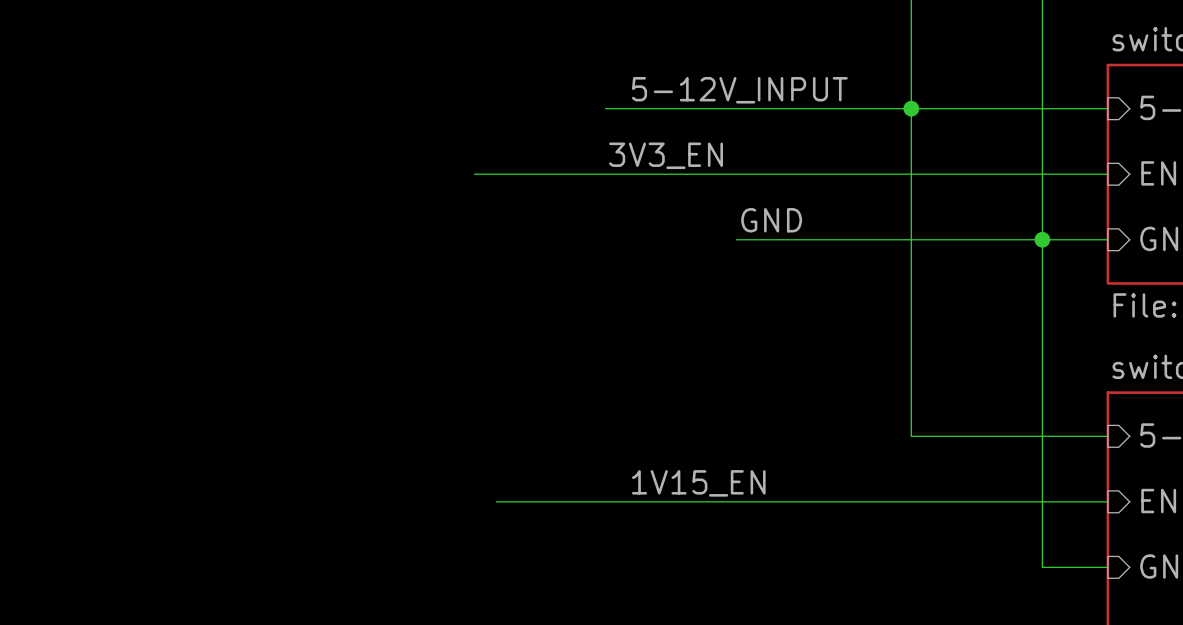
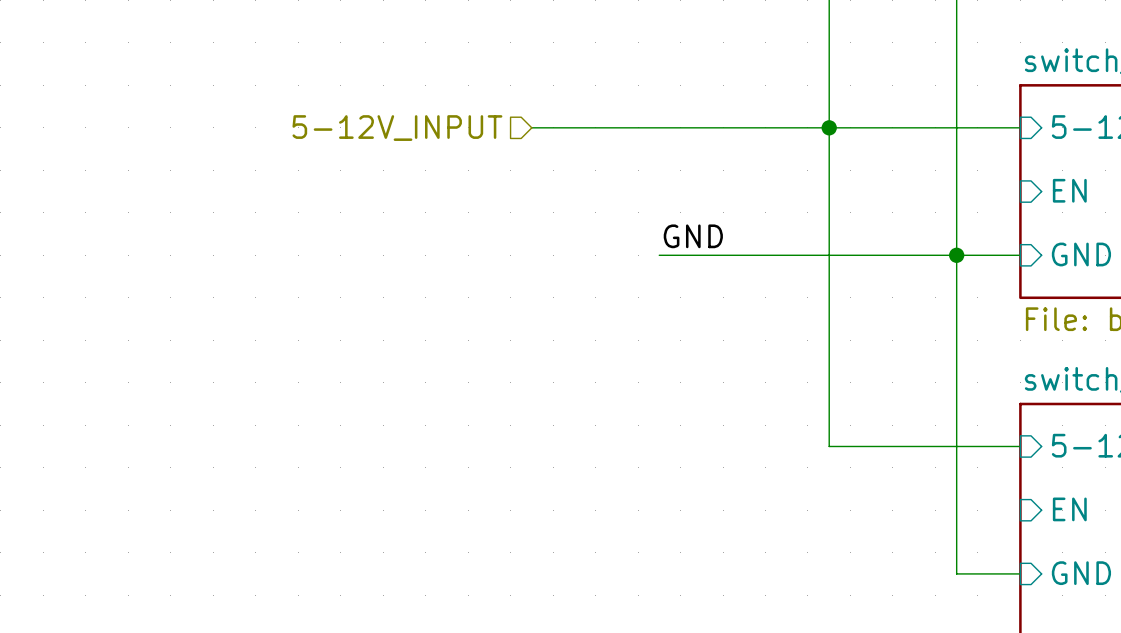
label: 5-12V_INPUT (739, 90) -> none
hierarchical label: none -> 5-12V_INPUT (397, 128)
label: 3V3_EN (666, 155) -> none
wire: (474, 174) (1107, 174) -> none
label: 1V15_EN (698, 483) -> none
wire: (496, 501) (1107, 501) -> none

